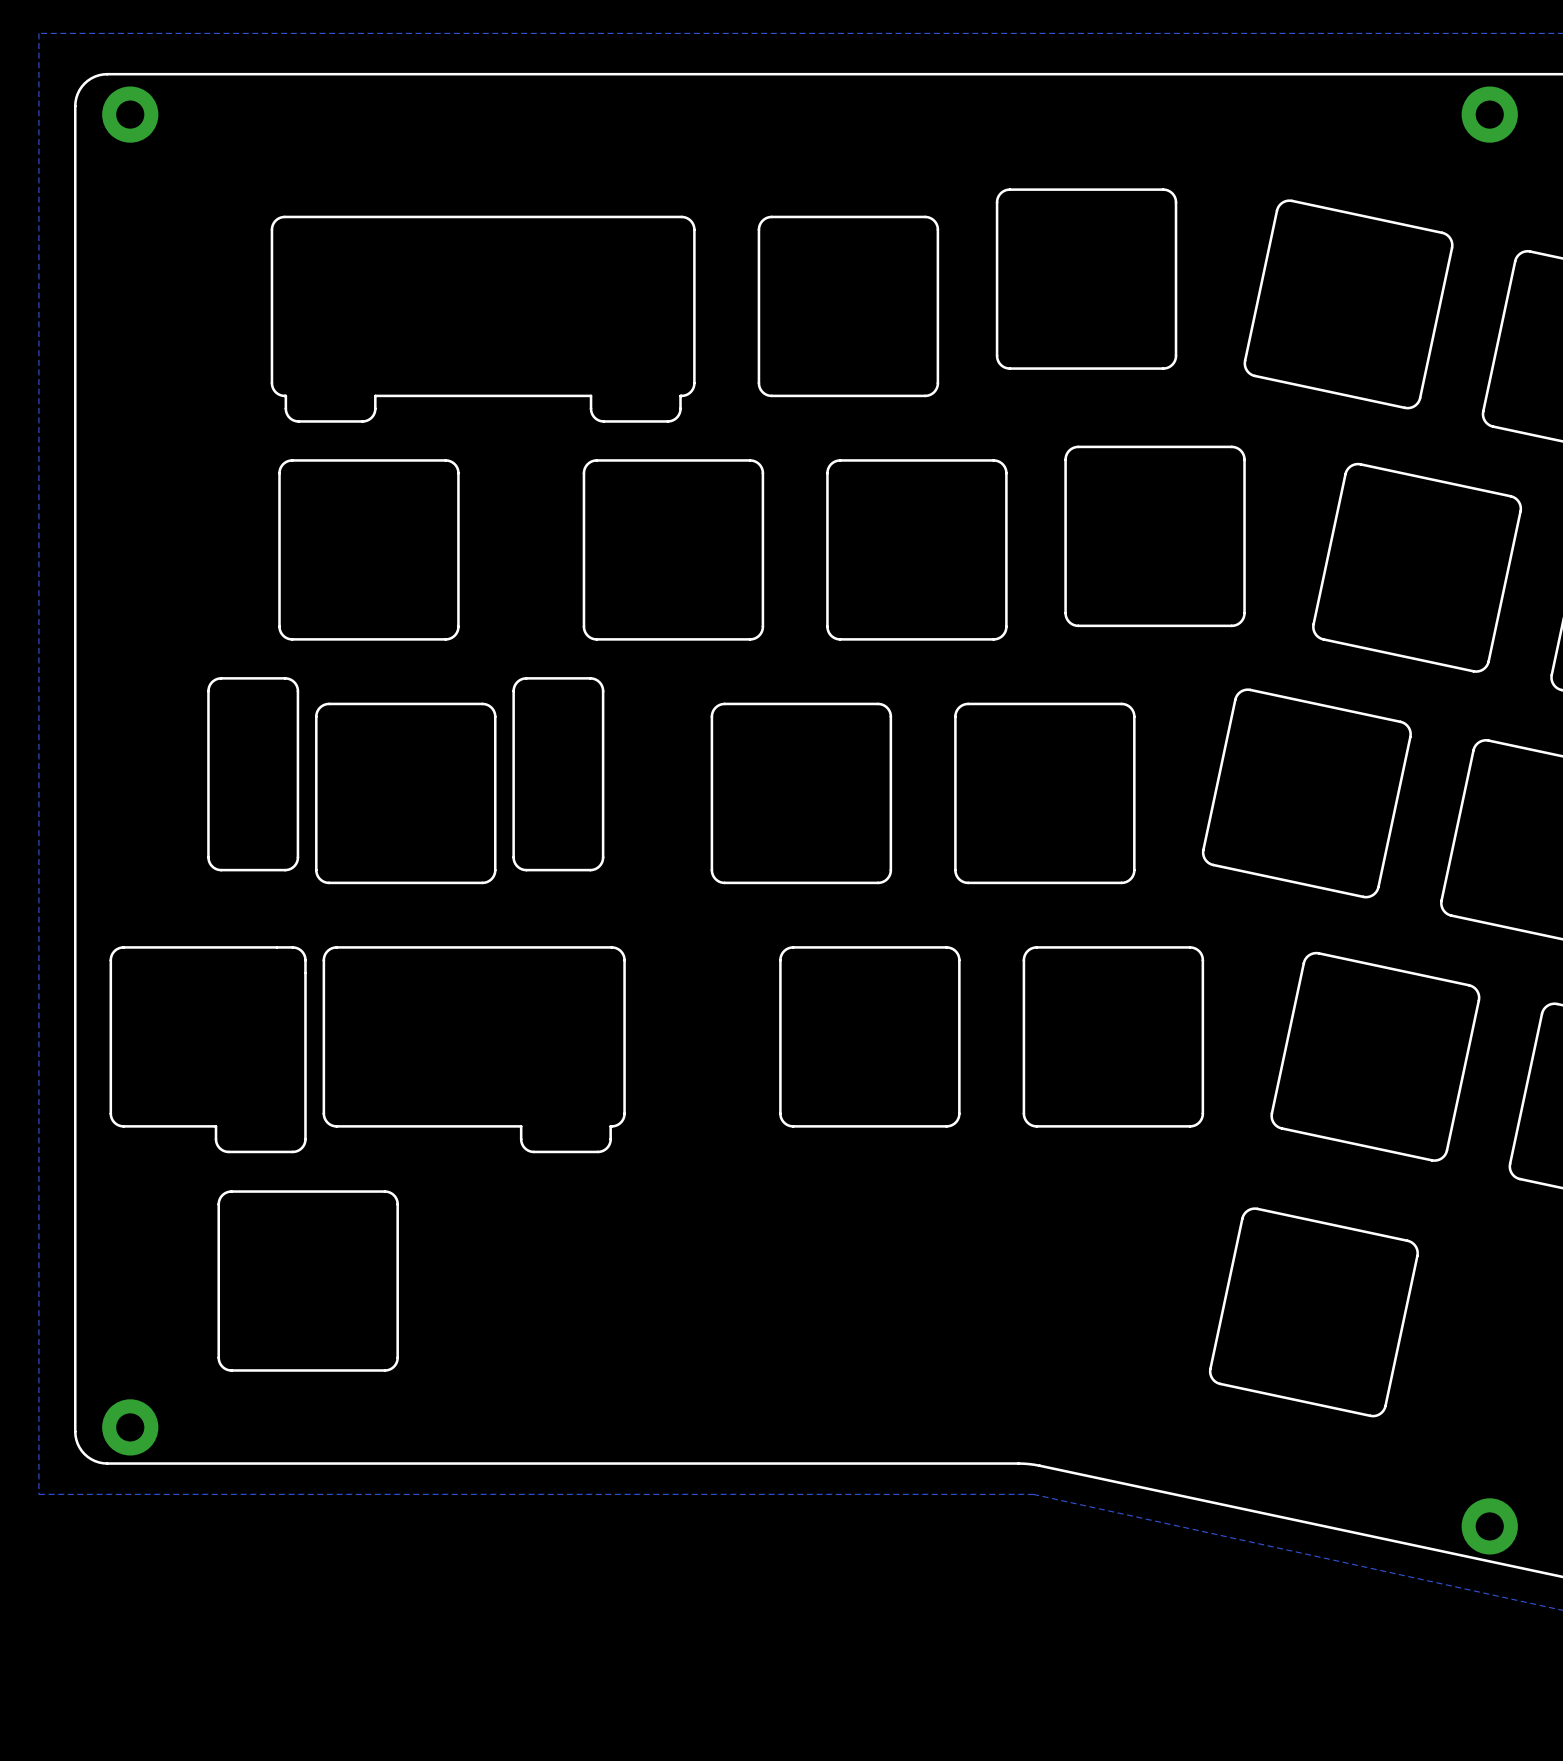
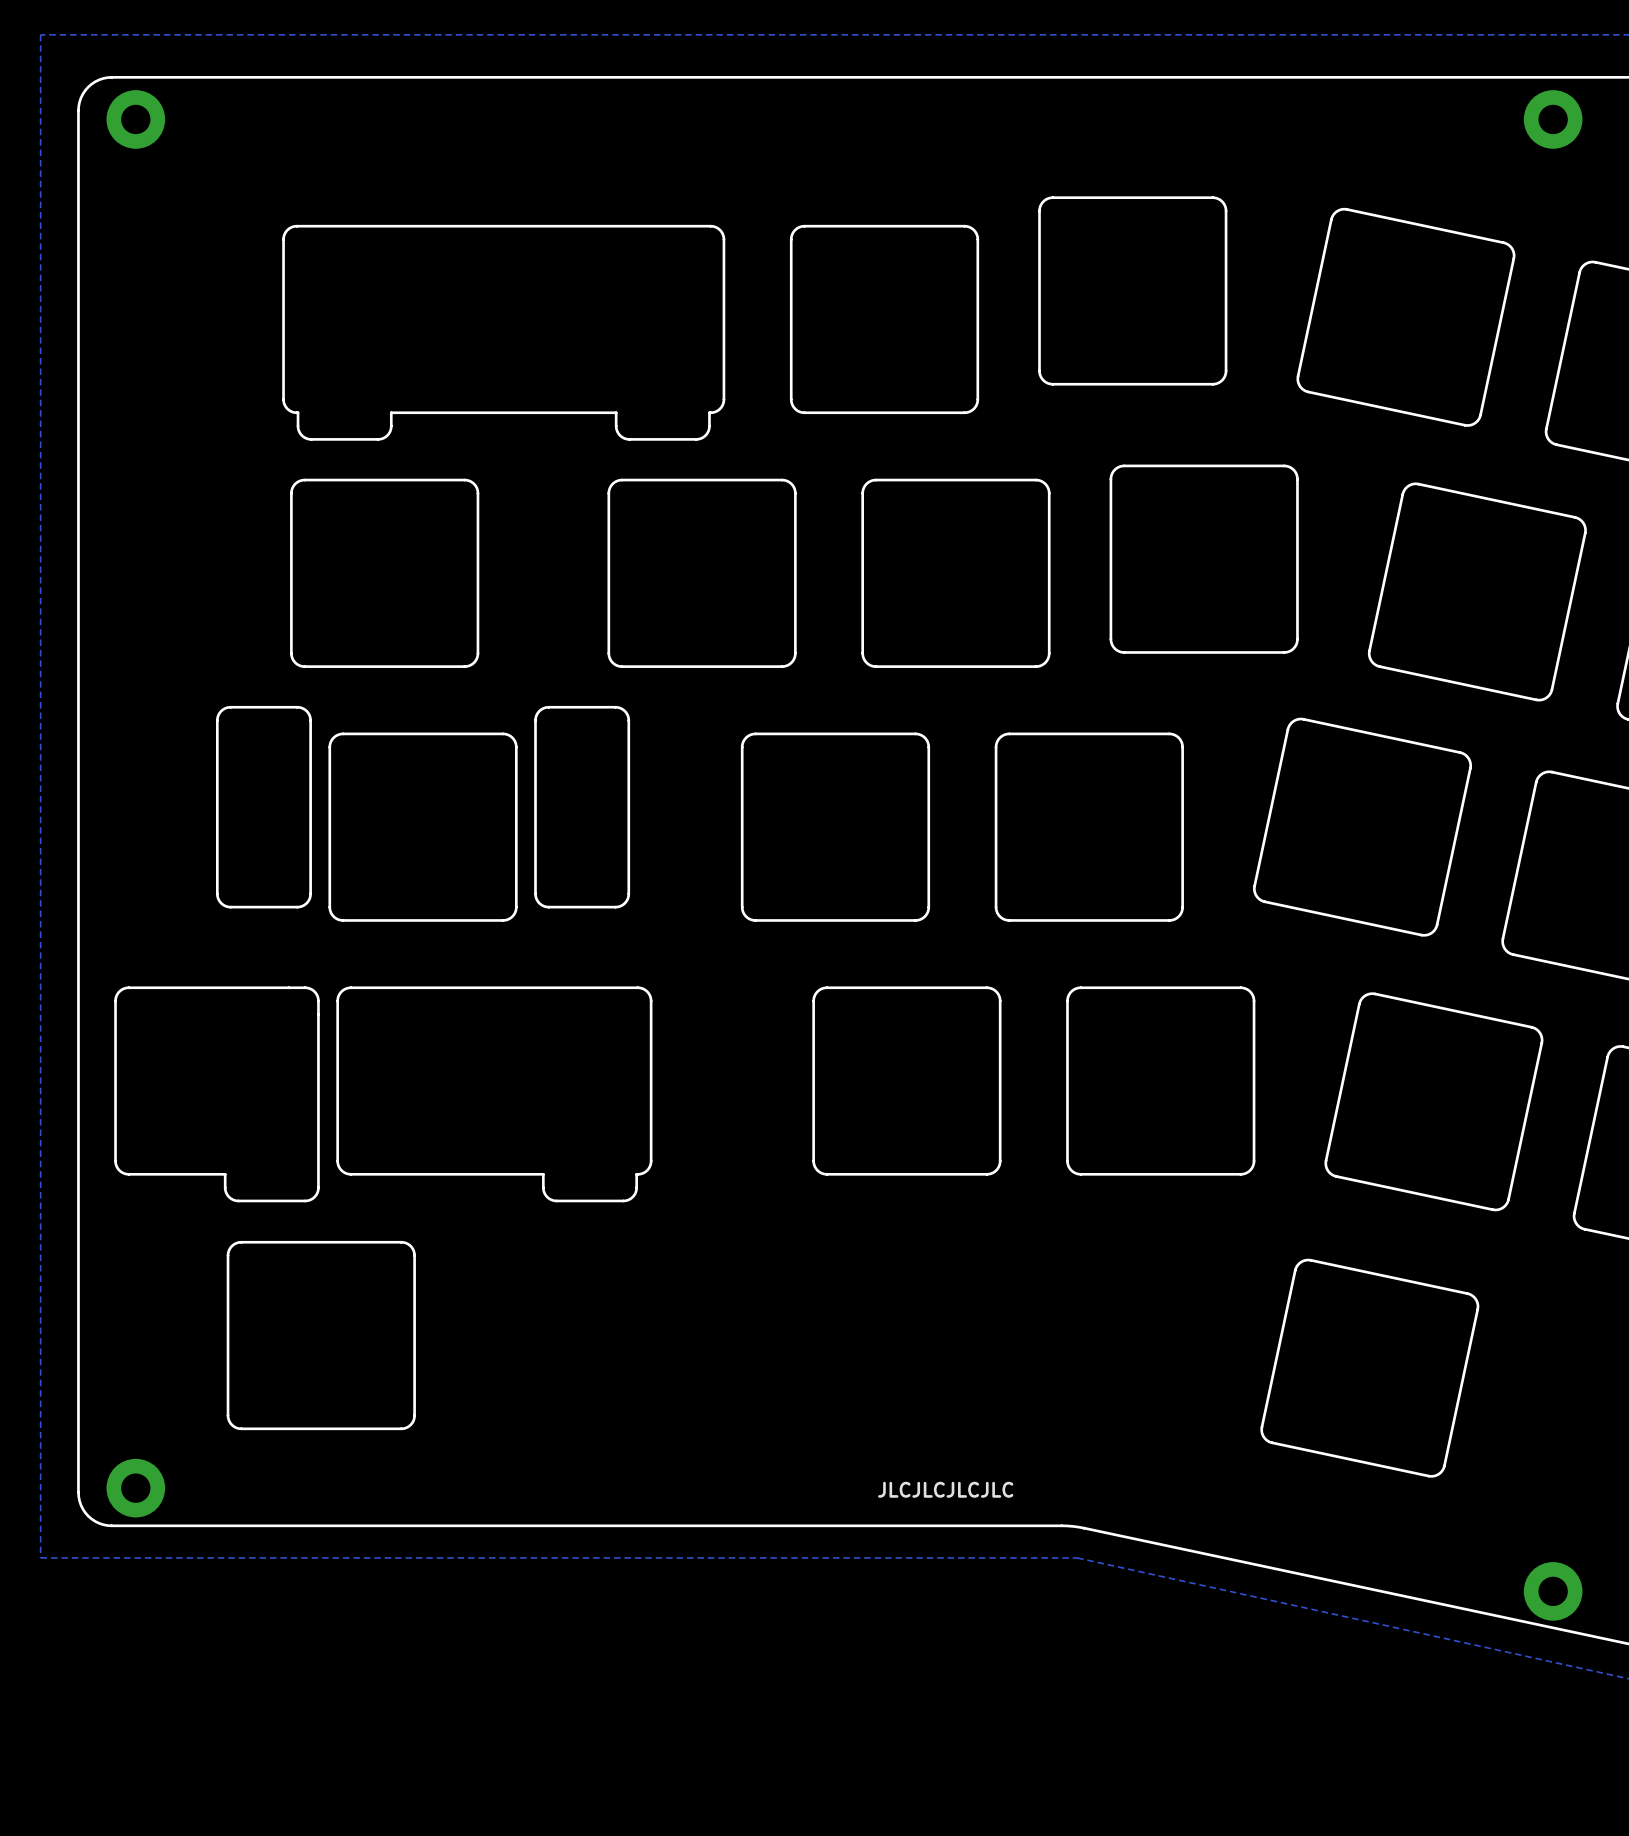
text: none -> JLCJLCJLCJLC (945, 1489)

